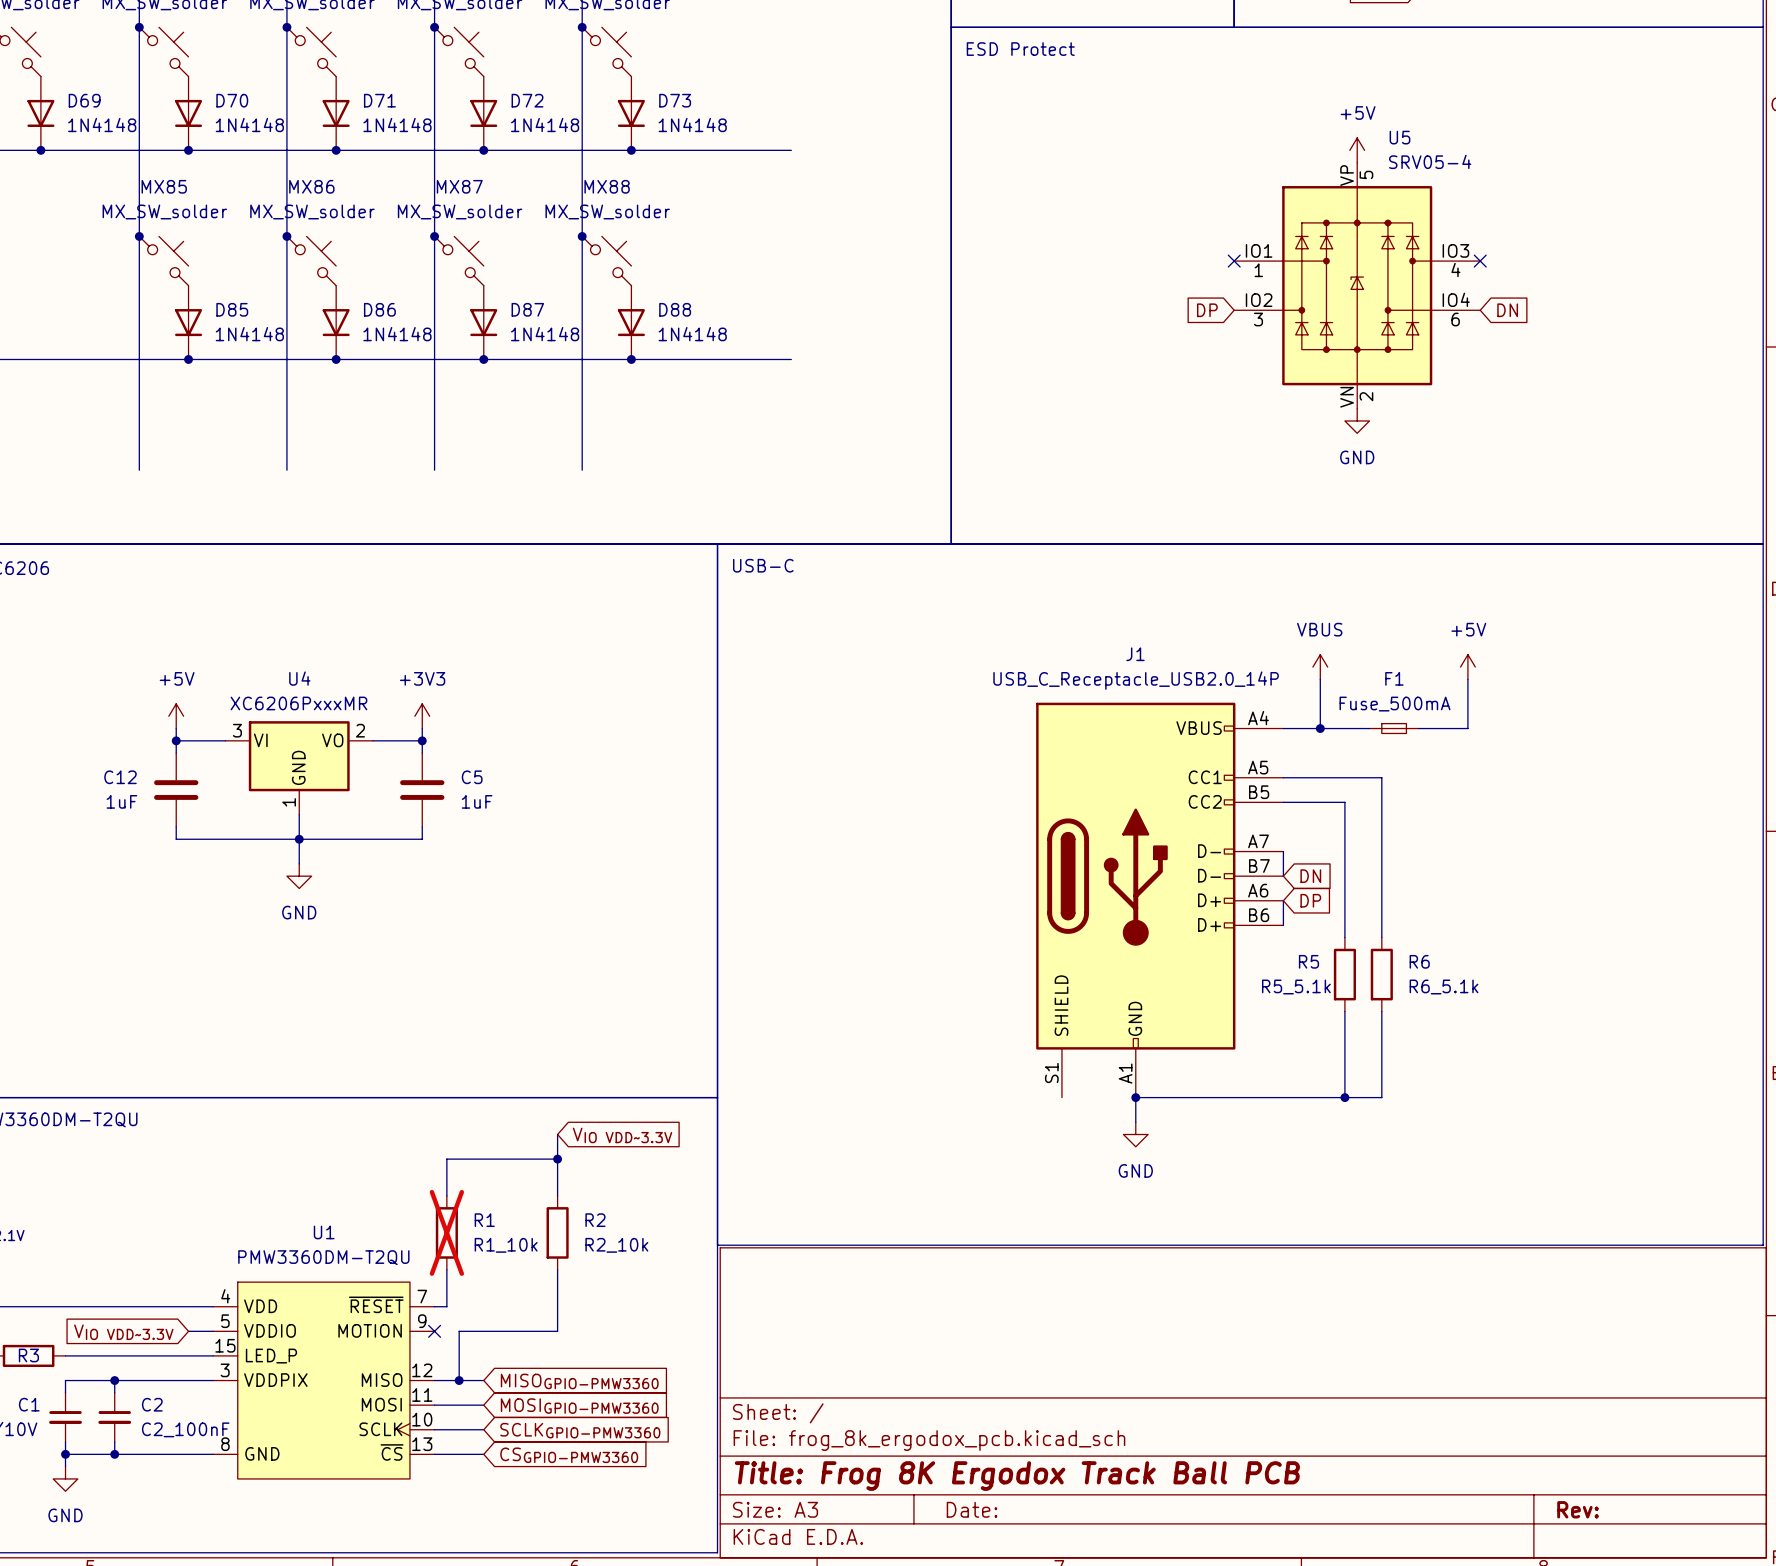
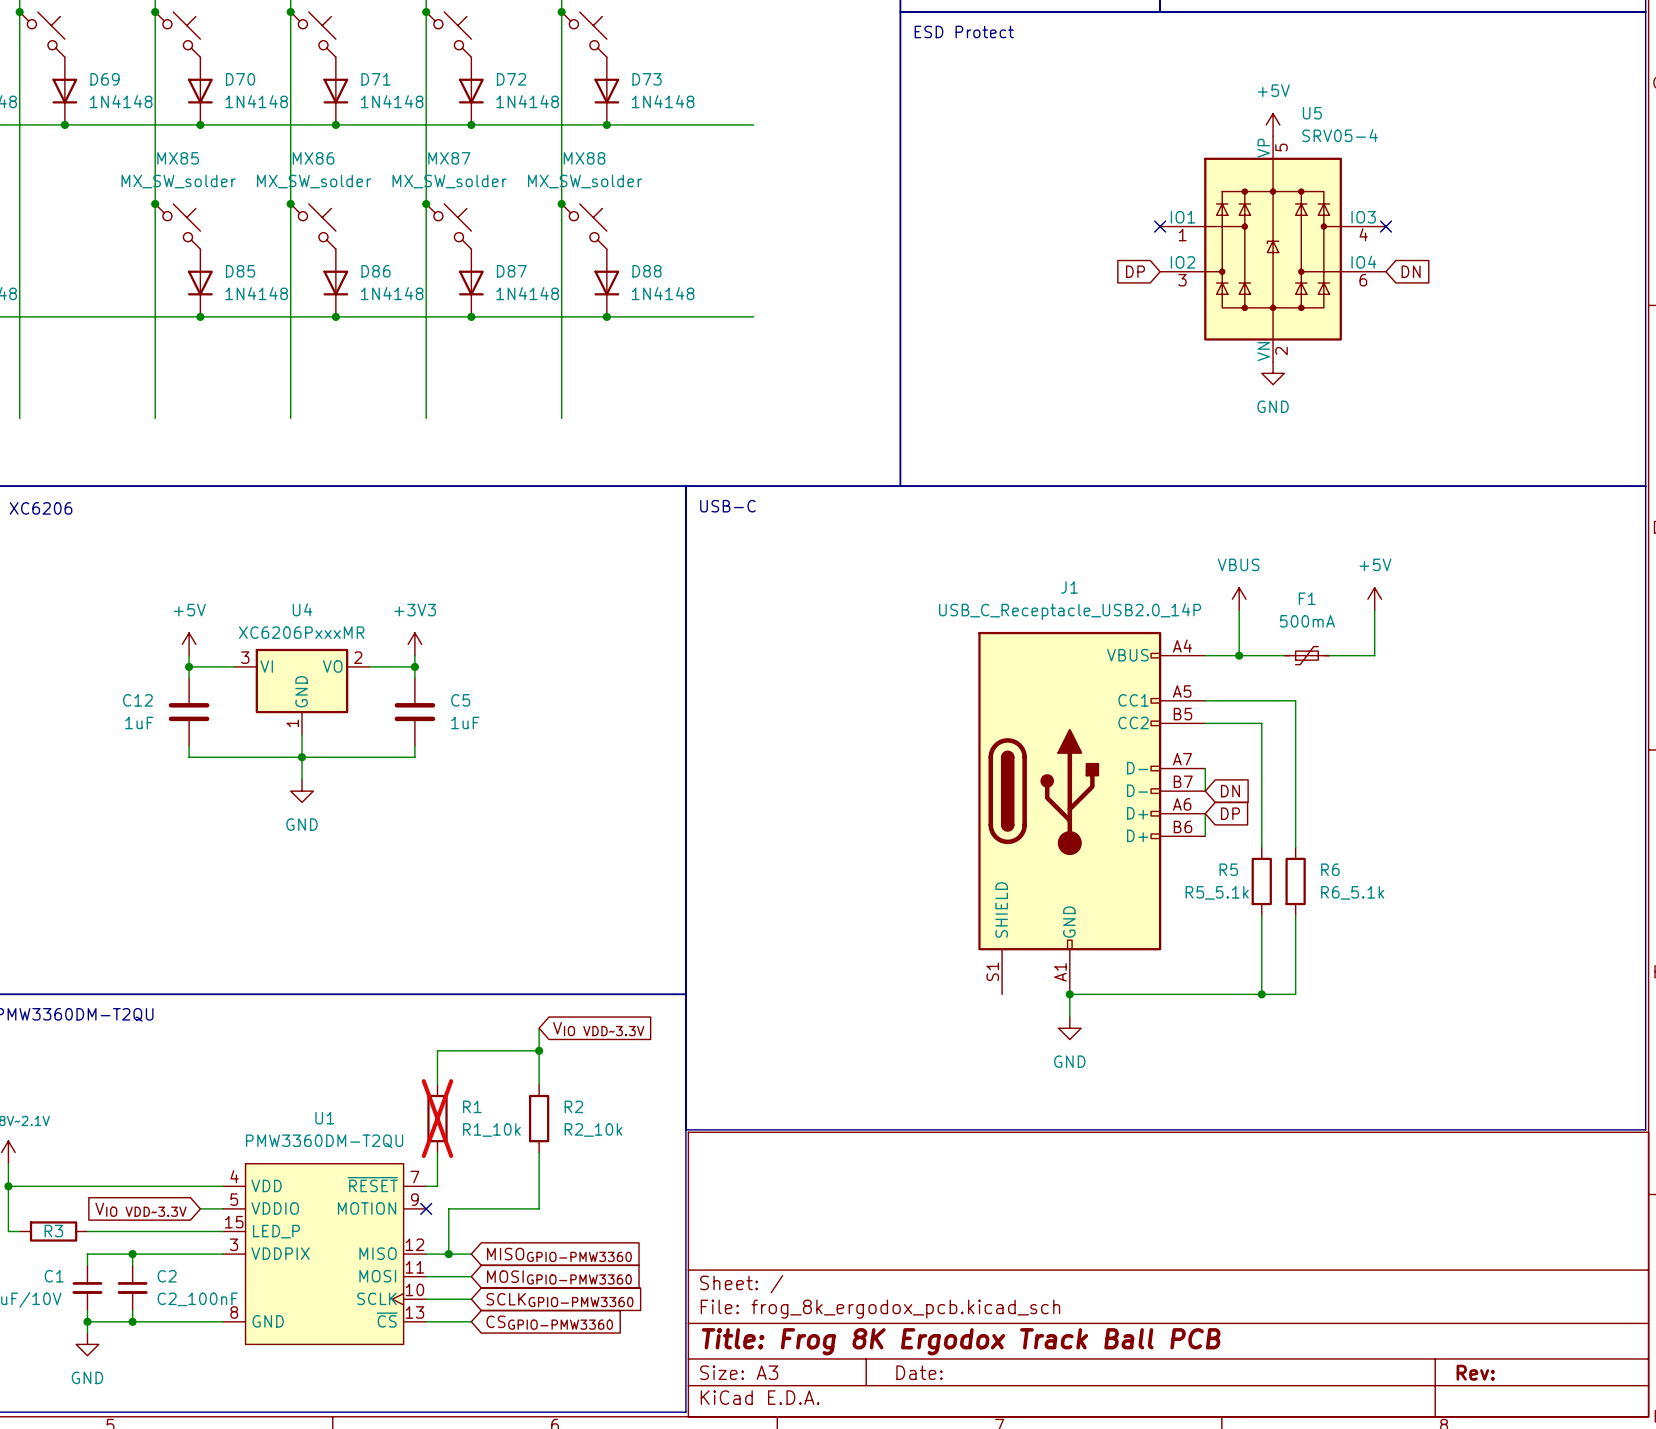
F1 value: Fuse_500mA (1395, 704) -> 500mA (1307, 621)
F1 symbol: [1369, 723, 1419, 734] -> [1284, 646, 1330, 665]

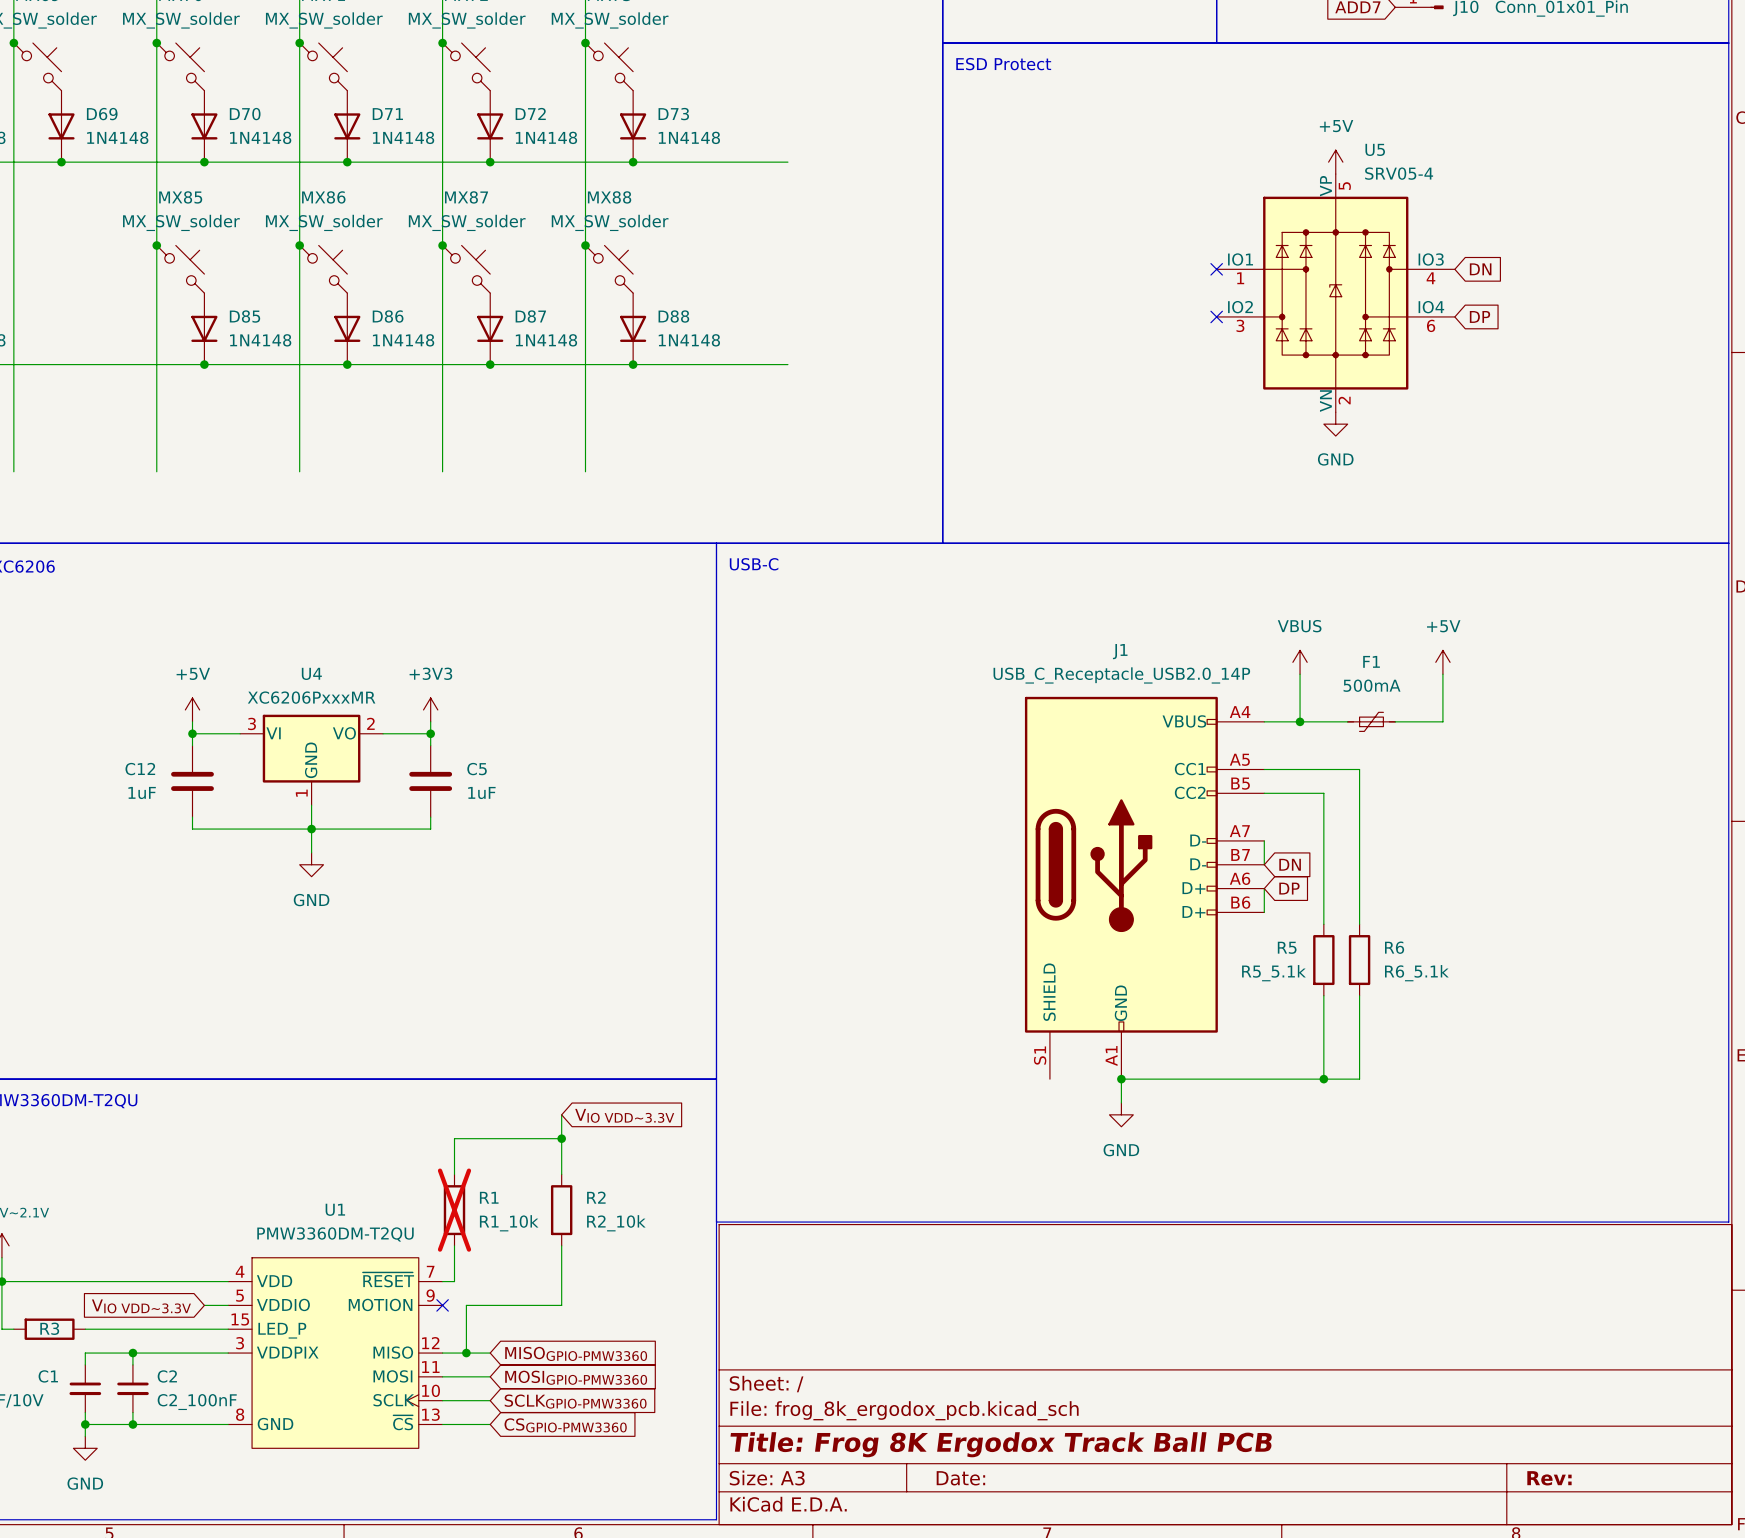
no-connect mark: (1385, 226) -> none
global label: none -> DN (1480, 269)
global label: DP (1135, 271) -> none
no-connect mark: none -> (1216, 316)
global label: DN (1411, 271) -> DP (1479, 316)

